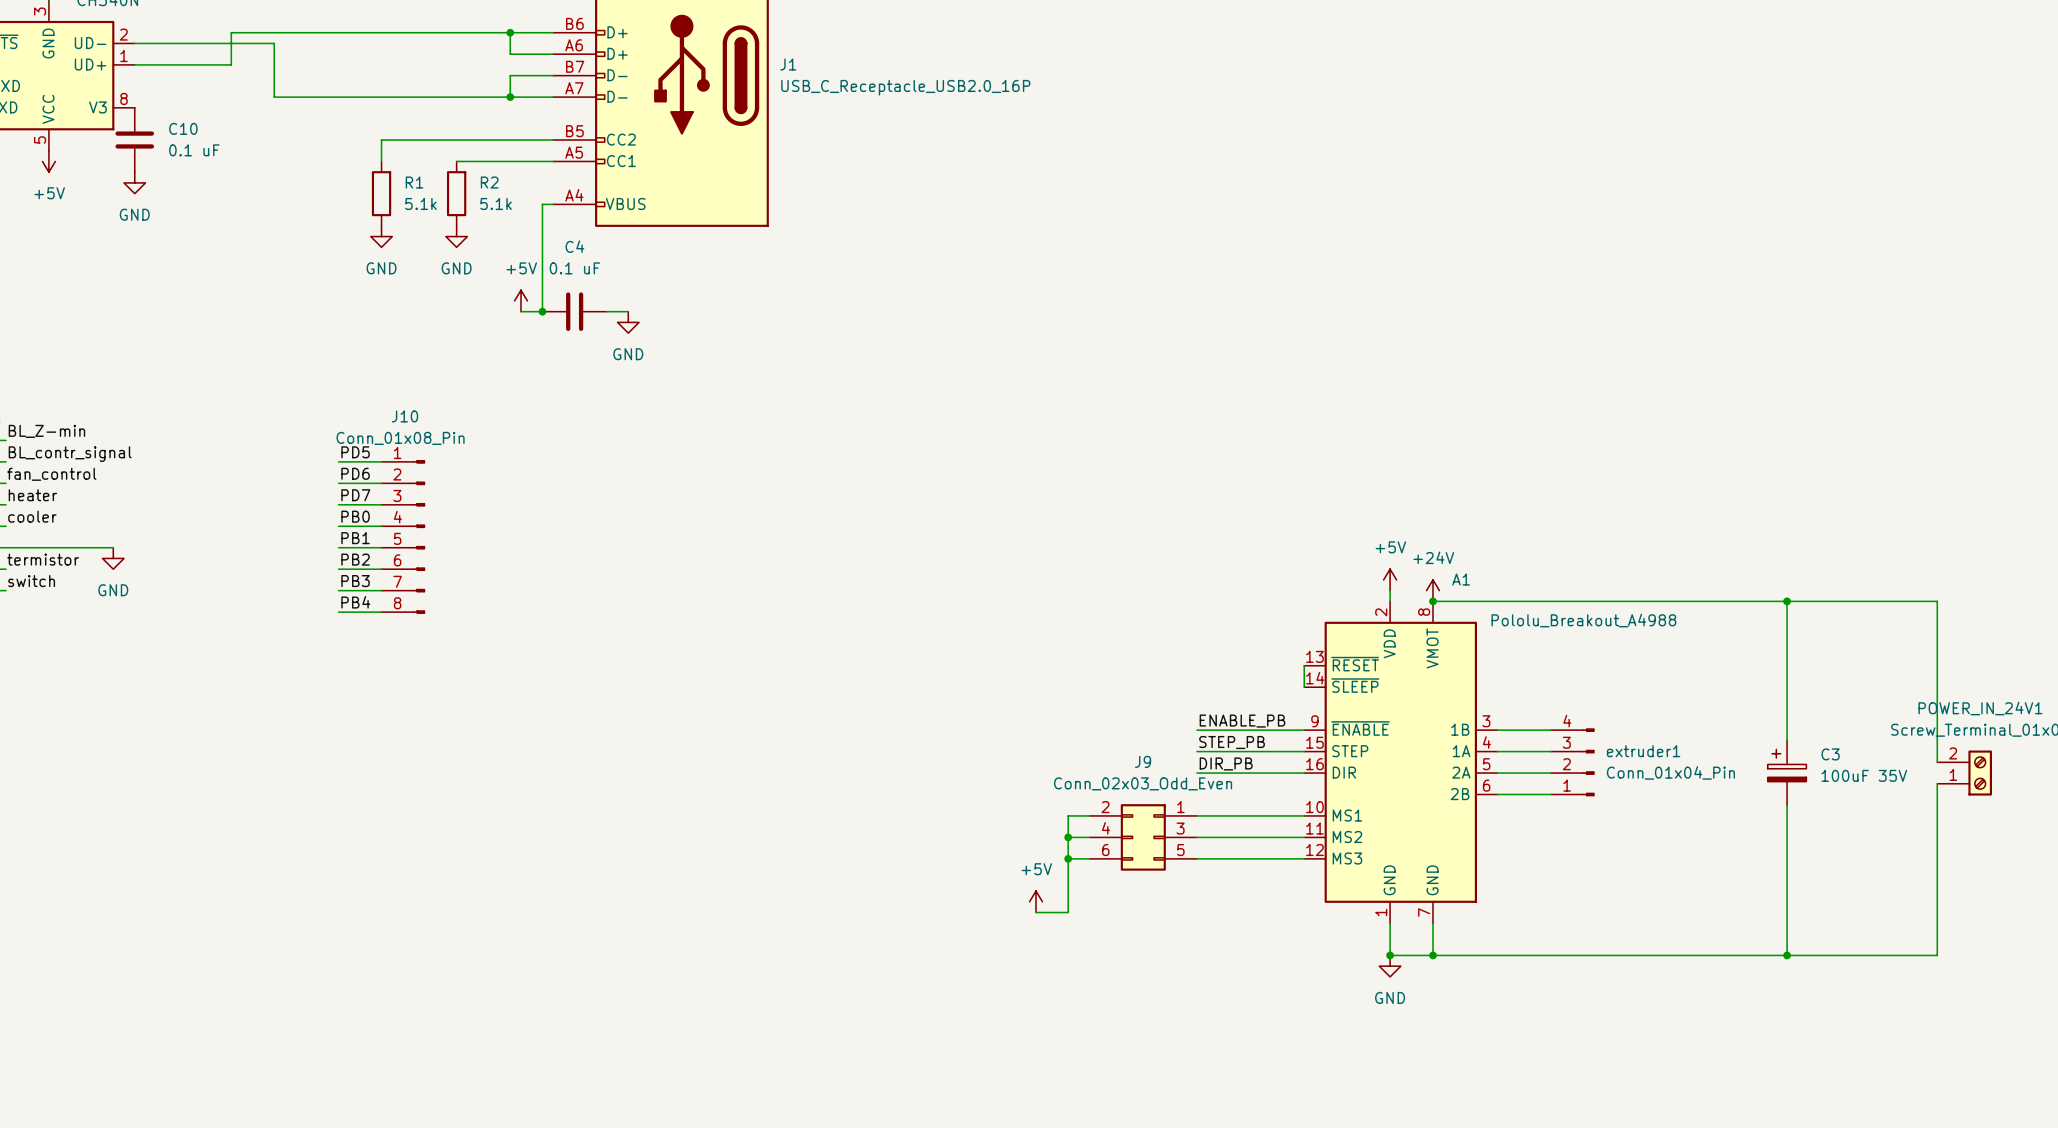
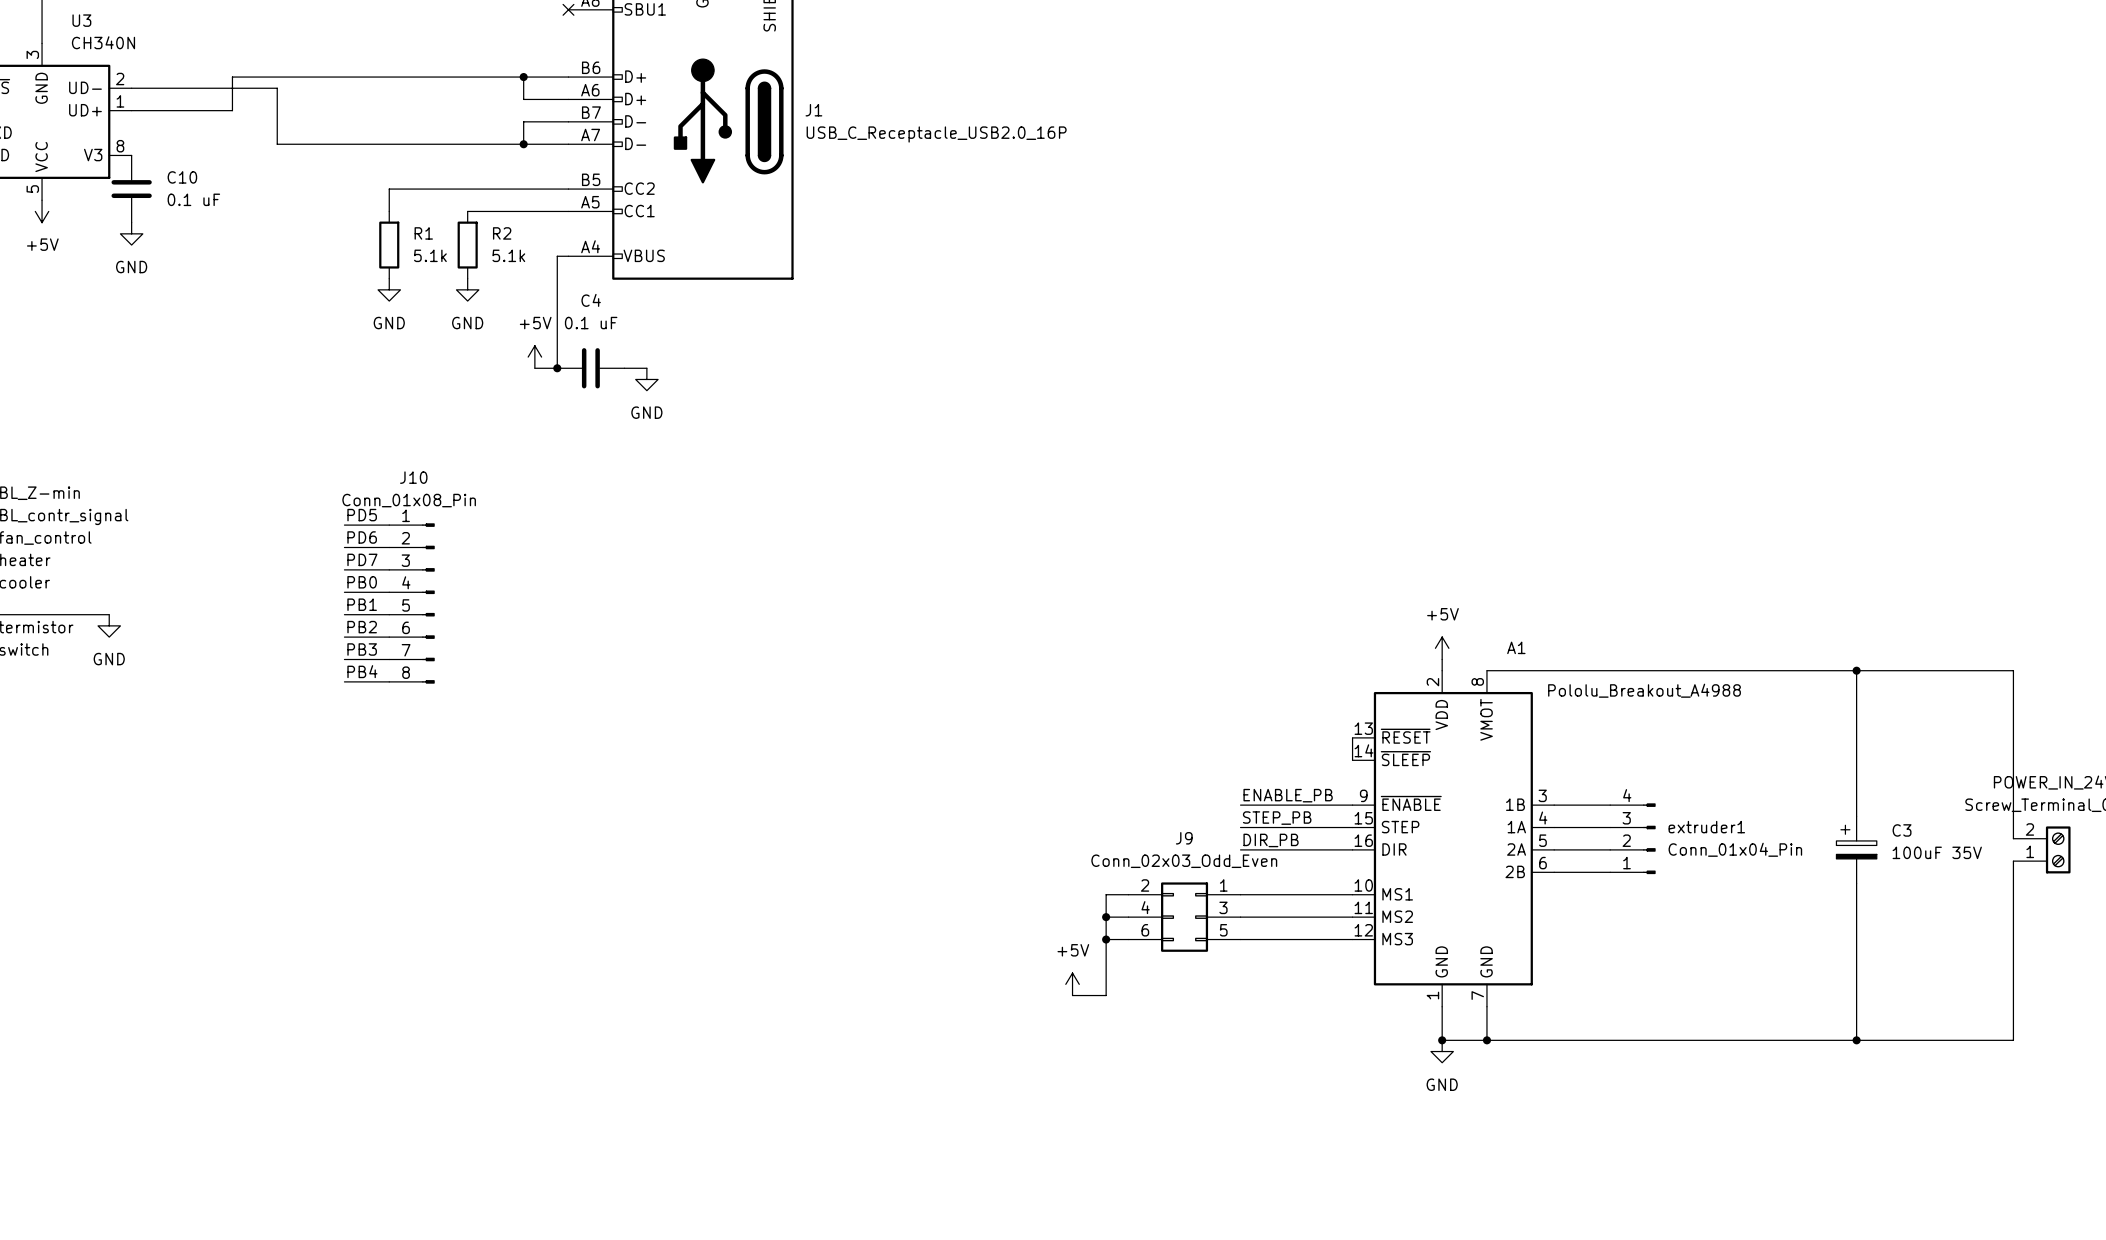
power symbol: +24V (1432, 590) -> none
junction: (1432, 601) -> none

